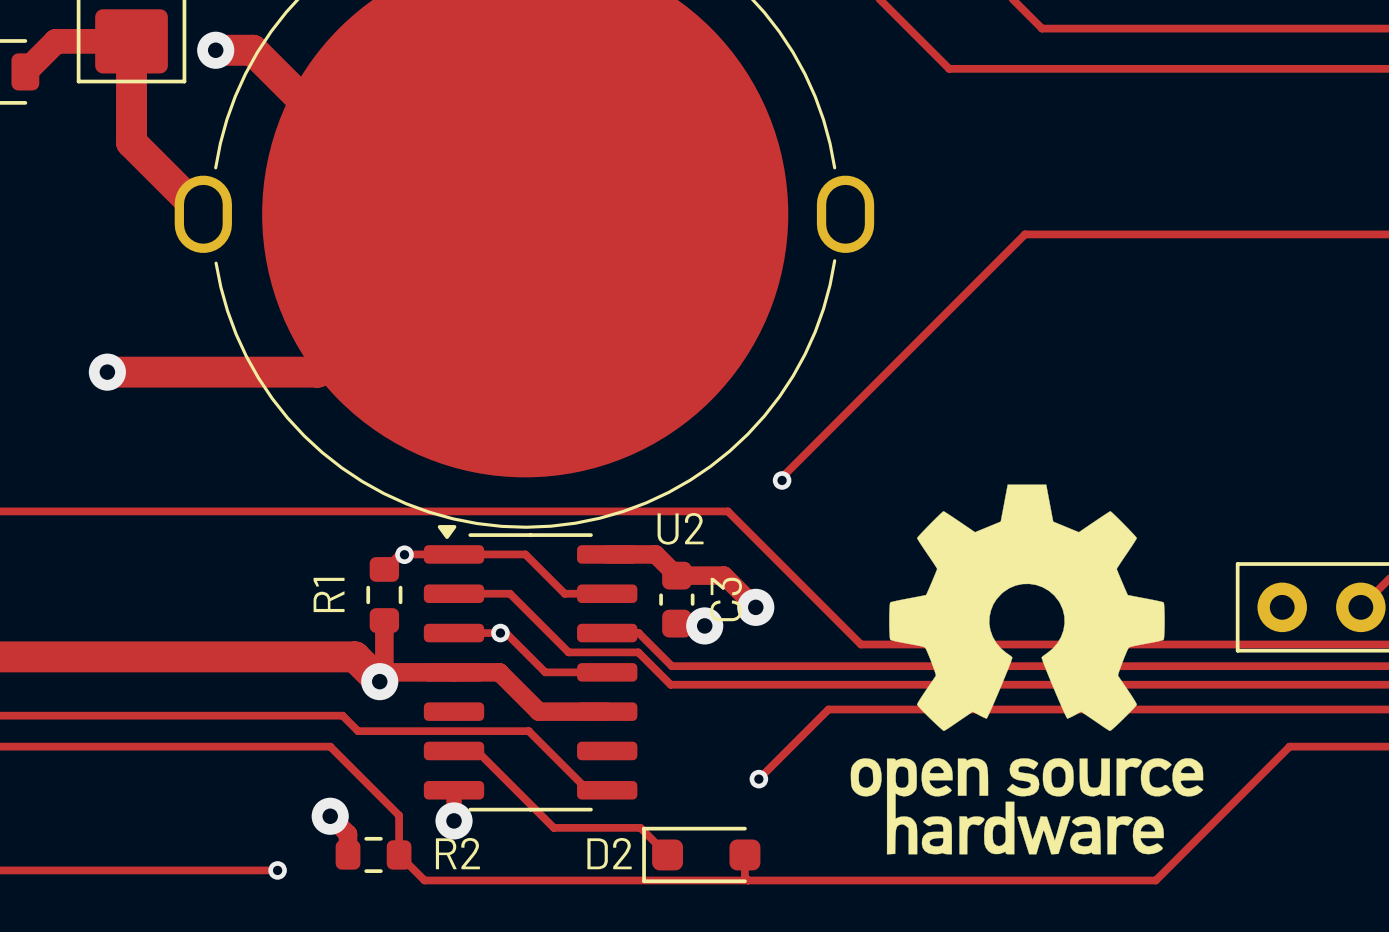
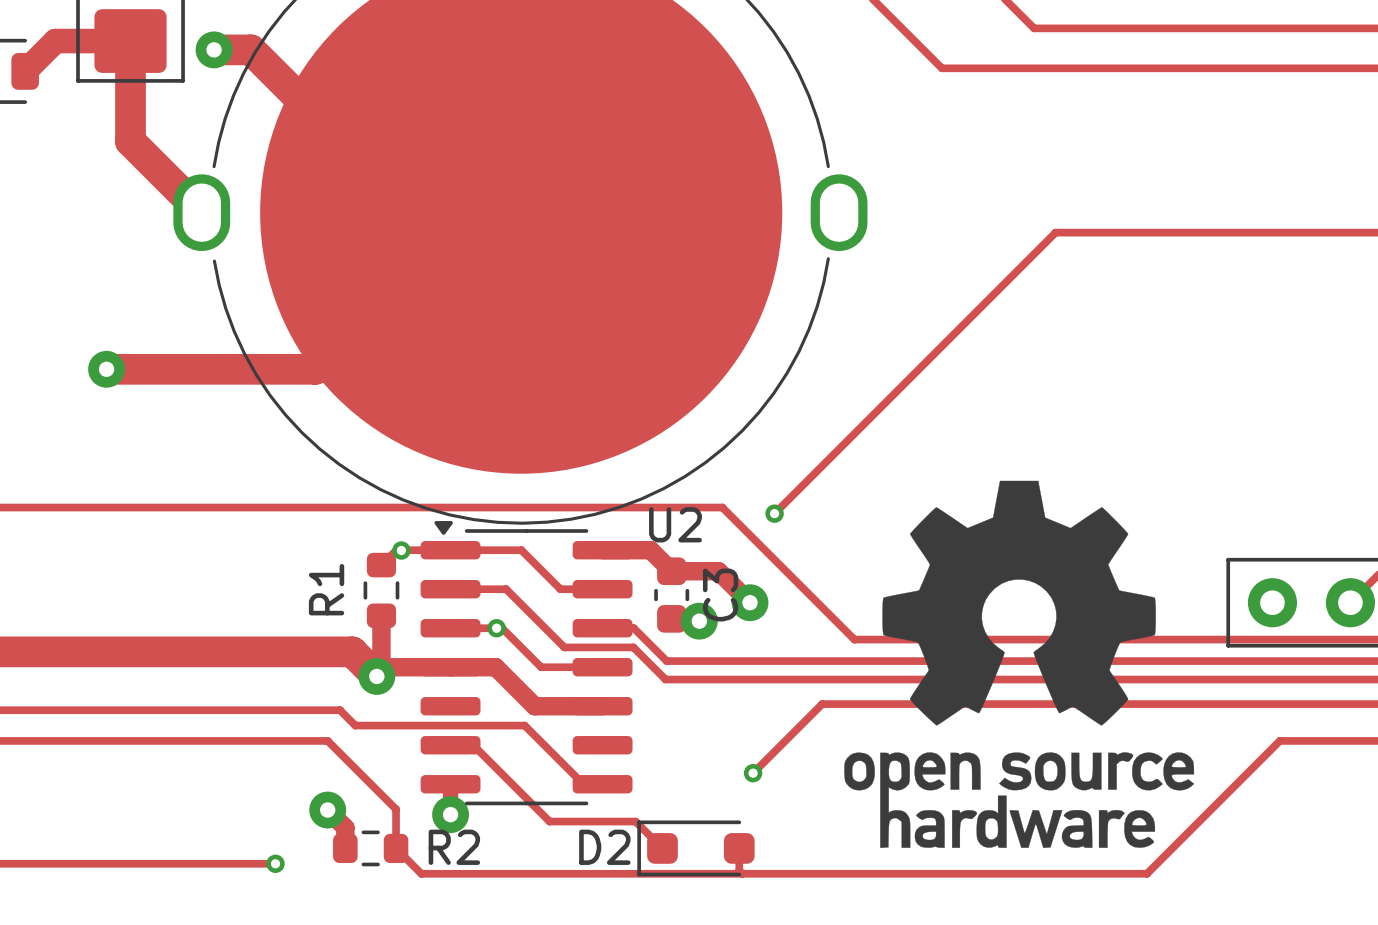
track: (1063, 234) (1025, 234) (782, 477) (782, 480) -> (1055, 232) (774, 513)
via position: (782, 480) -> (774, 513)

